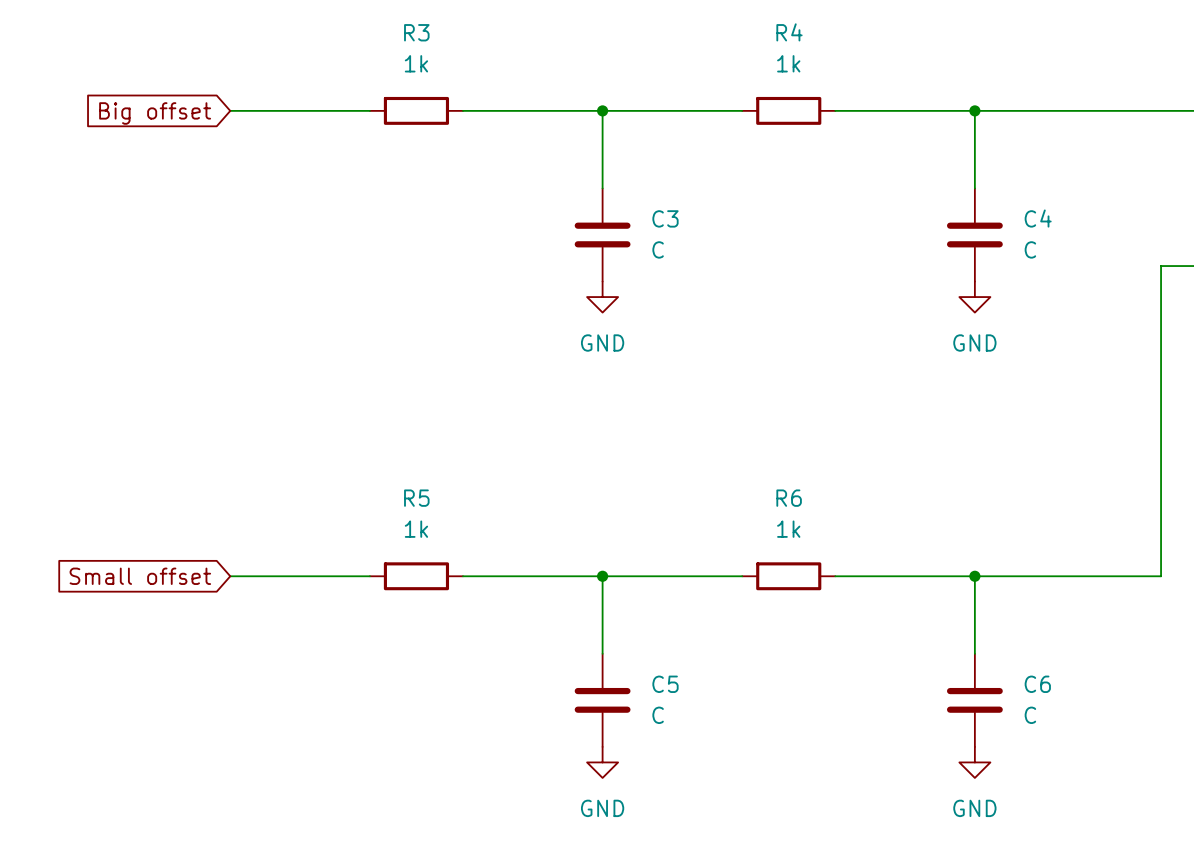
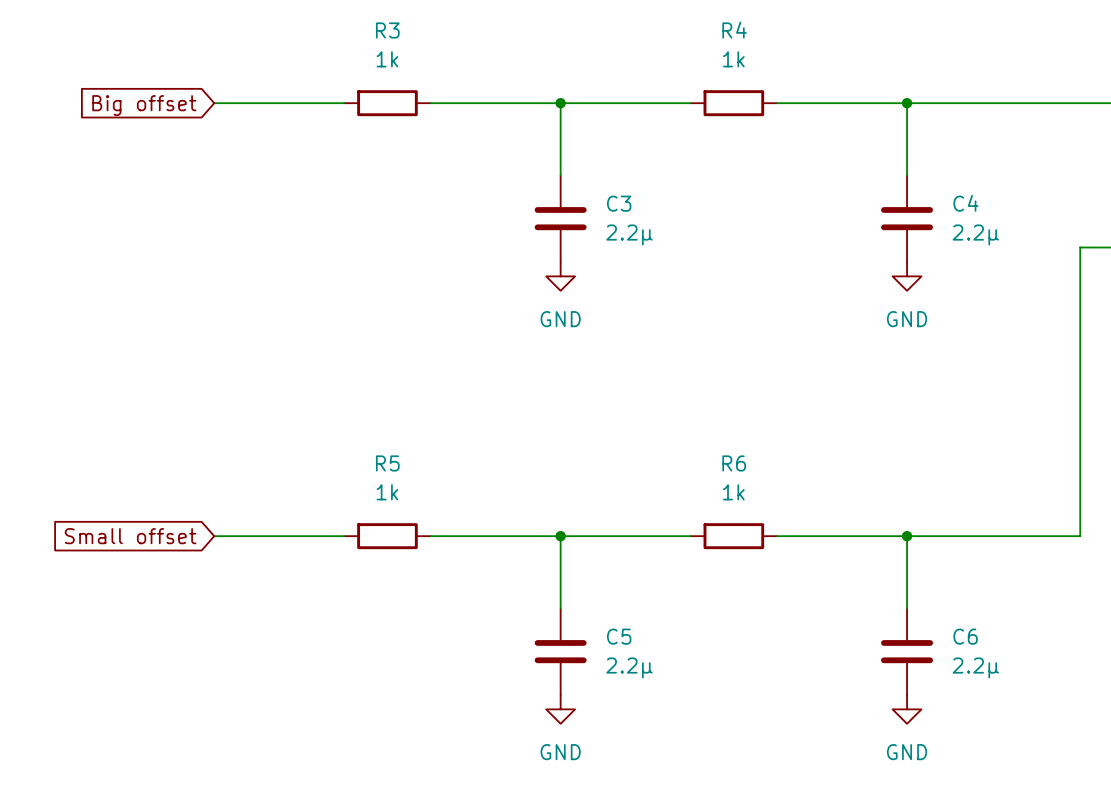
C3 value: C (658, 249) -> 2.2µ (629, 234)
C4 value: C (1030, 249) -> 2.2µ (975, 234)
C5 value: C (658, 715) -> 2.2µ (629, 667)
C6 value: C (1030, 715) -> 2.2µ (975, 667)

